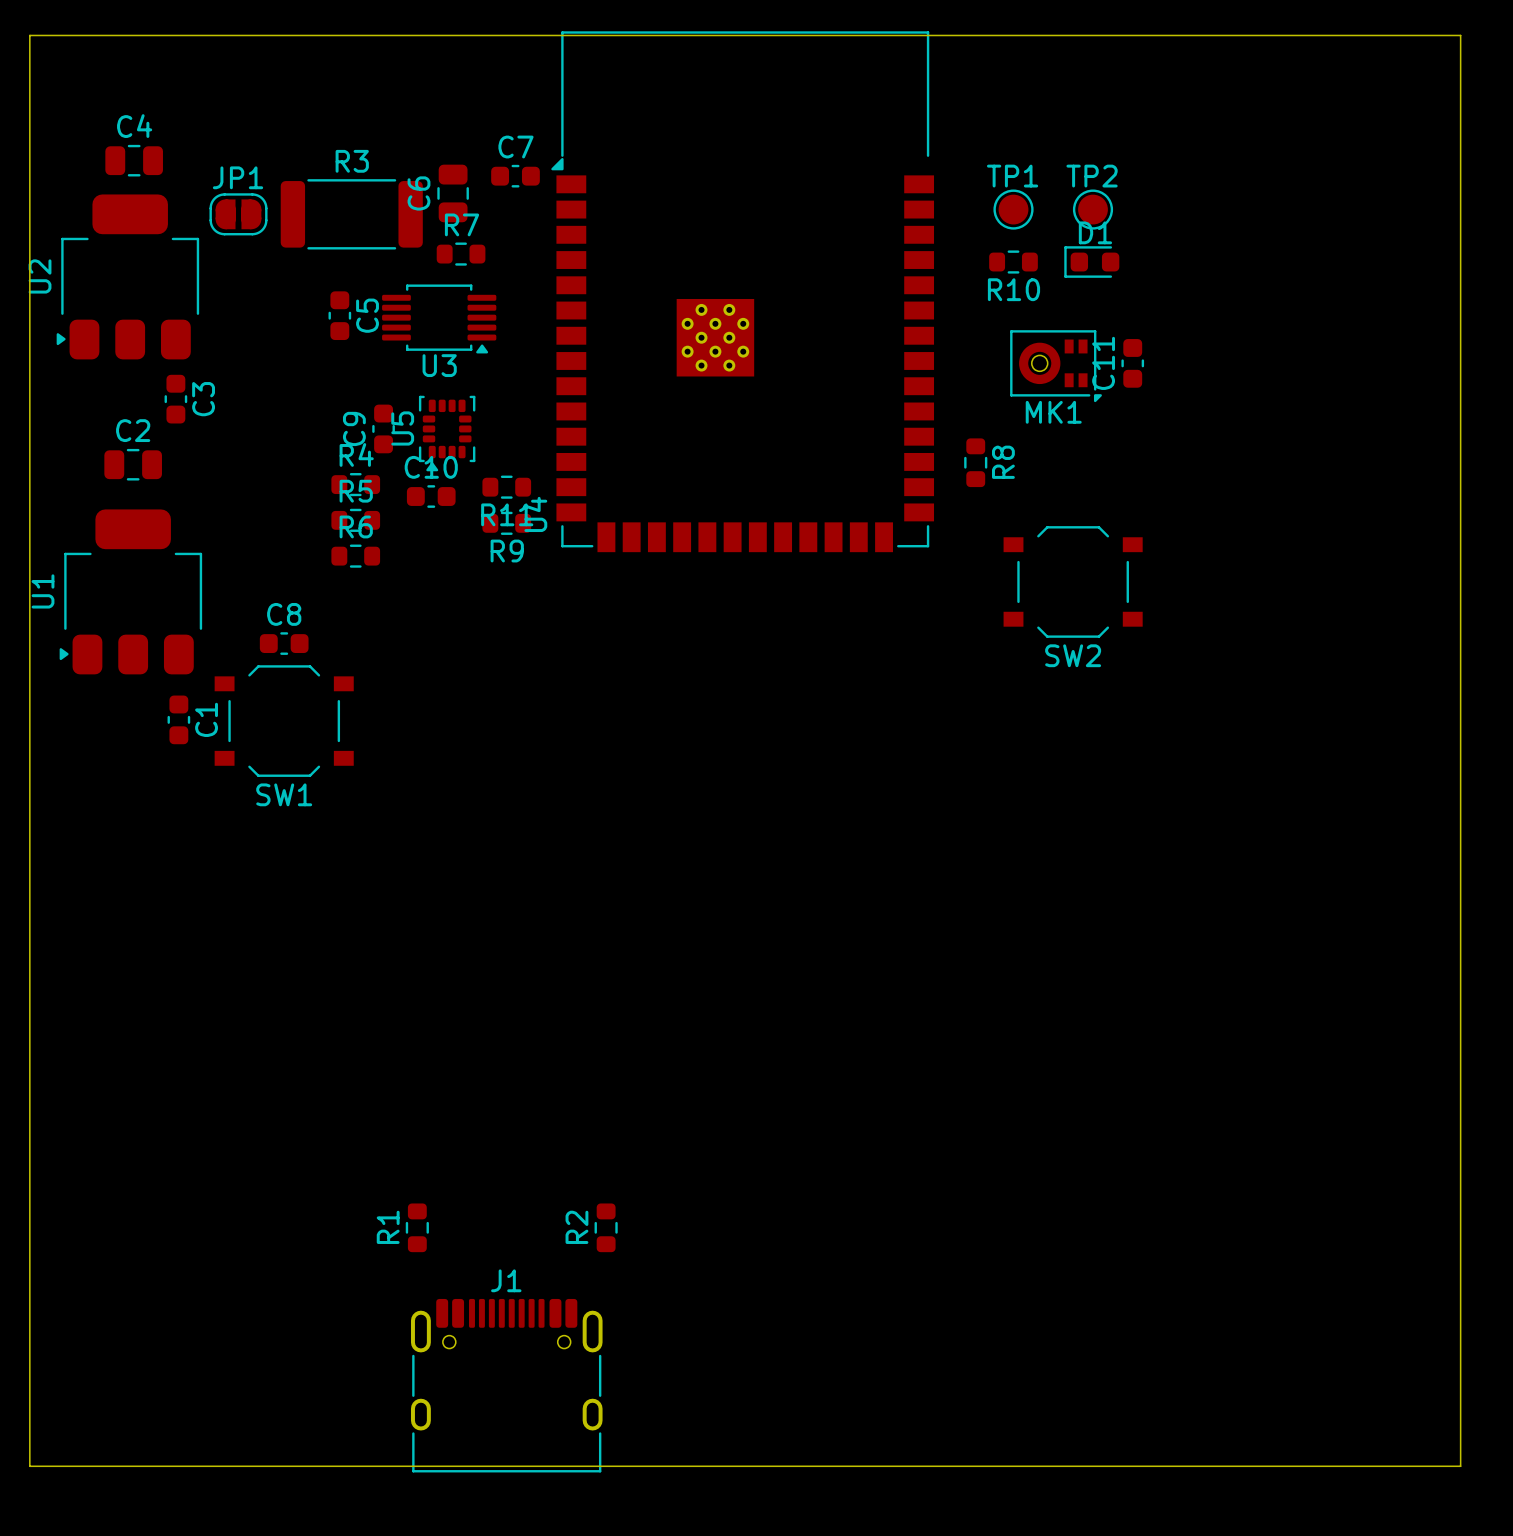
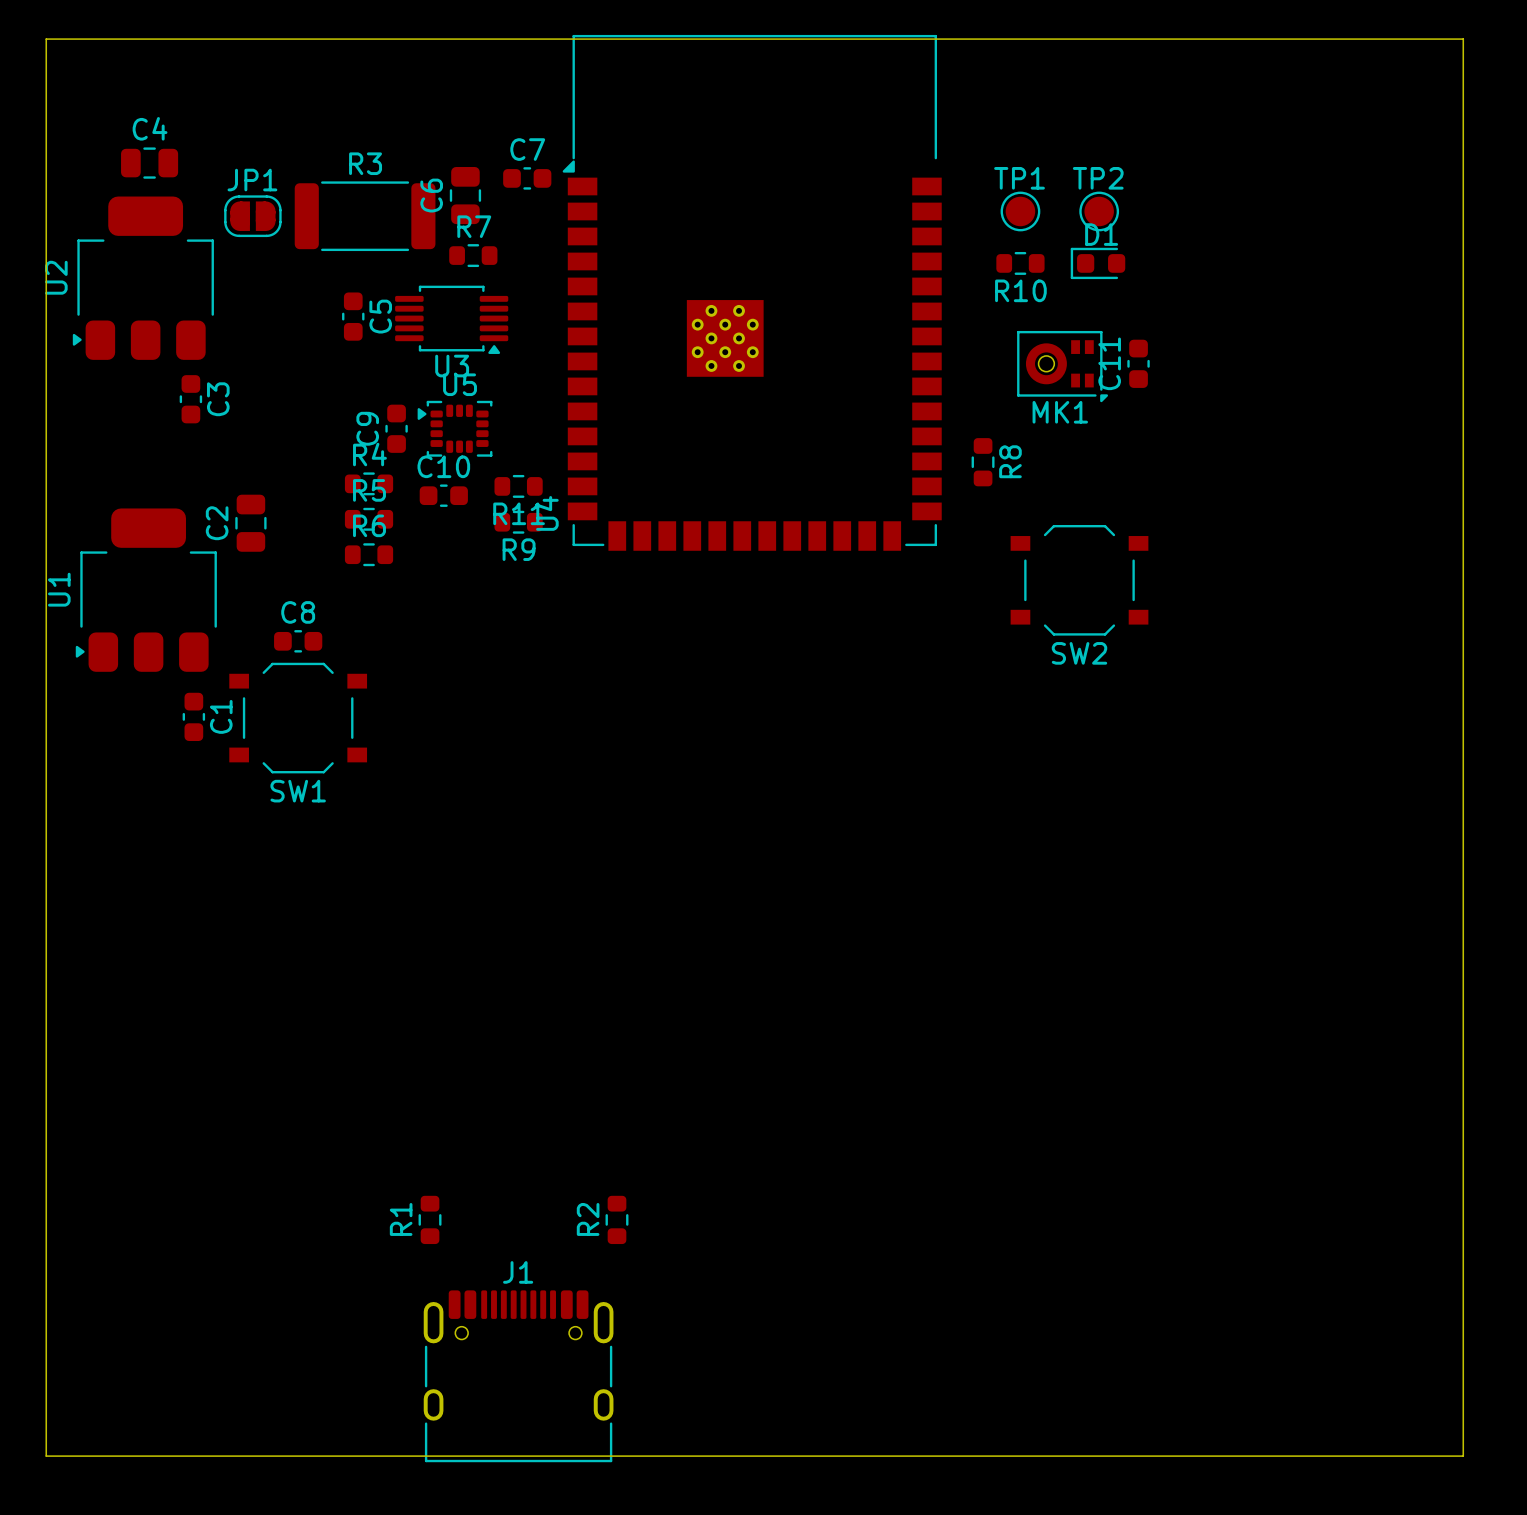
C2 name position: C2 (133, 430) -> C2 (217, 523)
U5 rotation: 0° (447, 433) -> 90° clockwise (455, 428)
C2 rotation: 0° (133, 464) -> 90° clockwise (250, 523)
C2 position: (133, 464) -> (250, 523)

